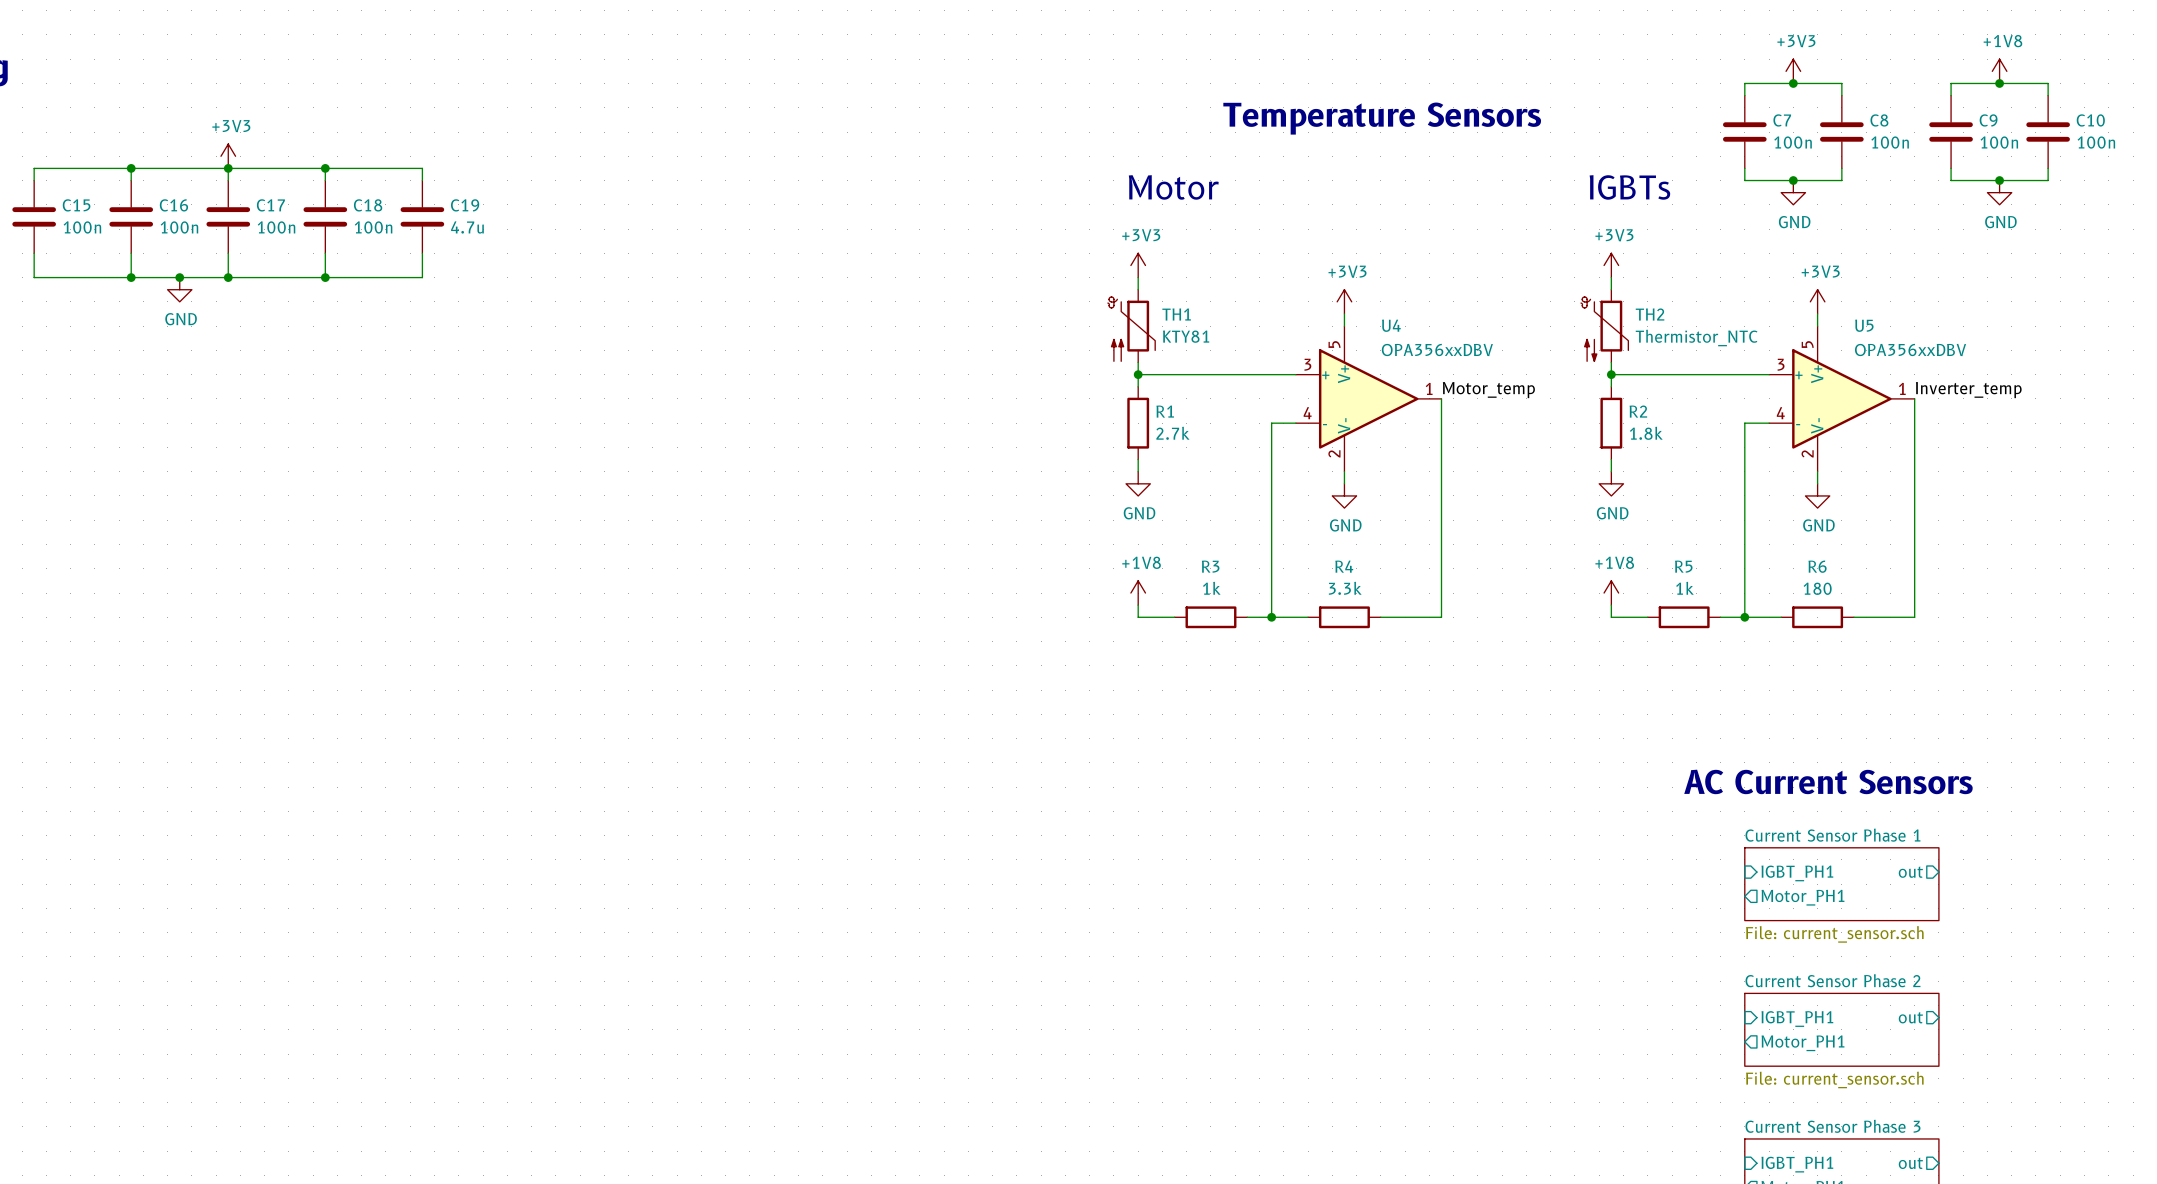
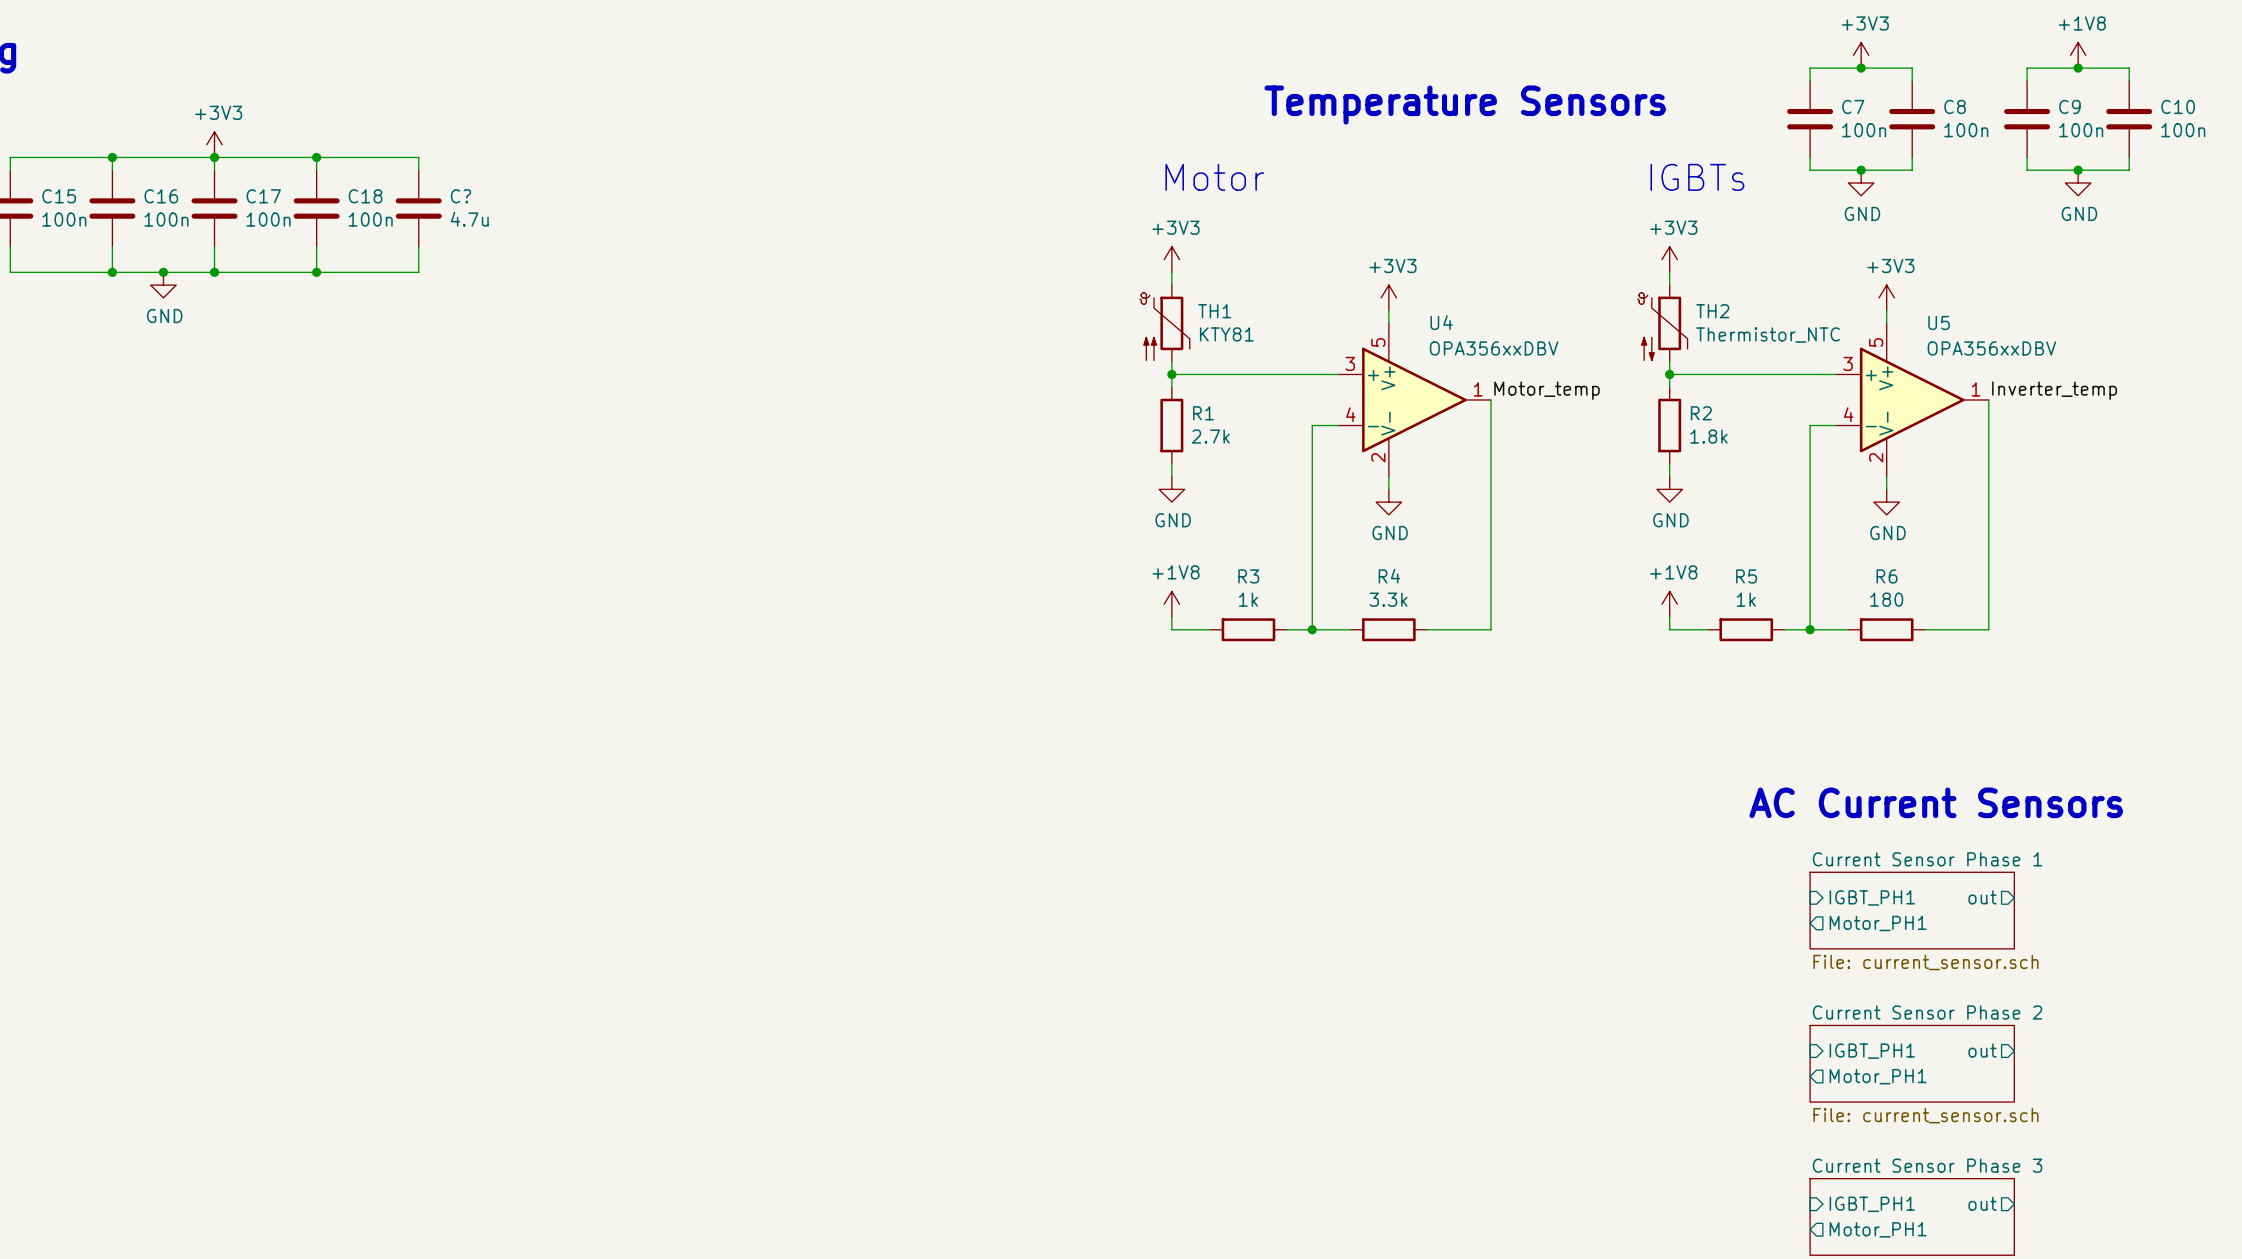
C19 name: C19 (465, 205) -> C? (460, 196)

